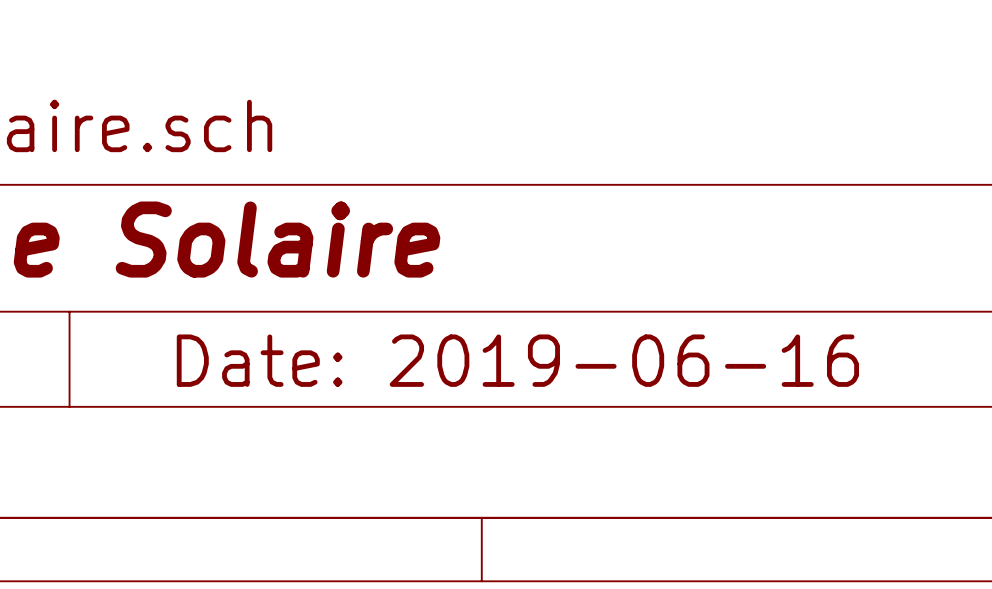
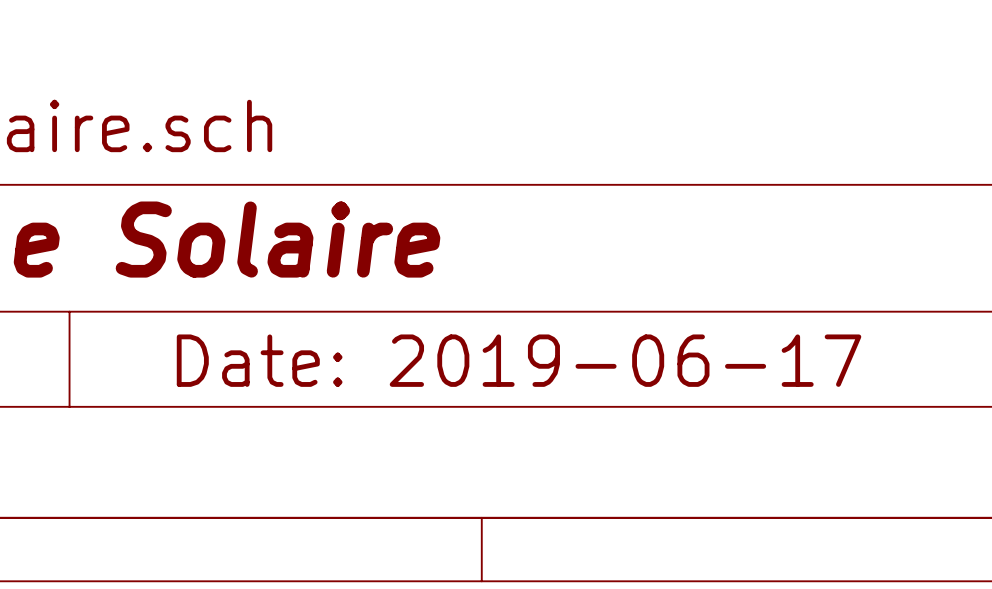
title block: Date: 2019-06-16 (517, 360) -> Date: 2019-06-17 (519, 360)

